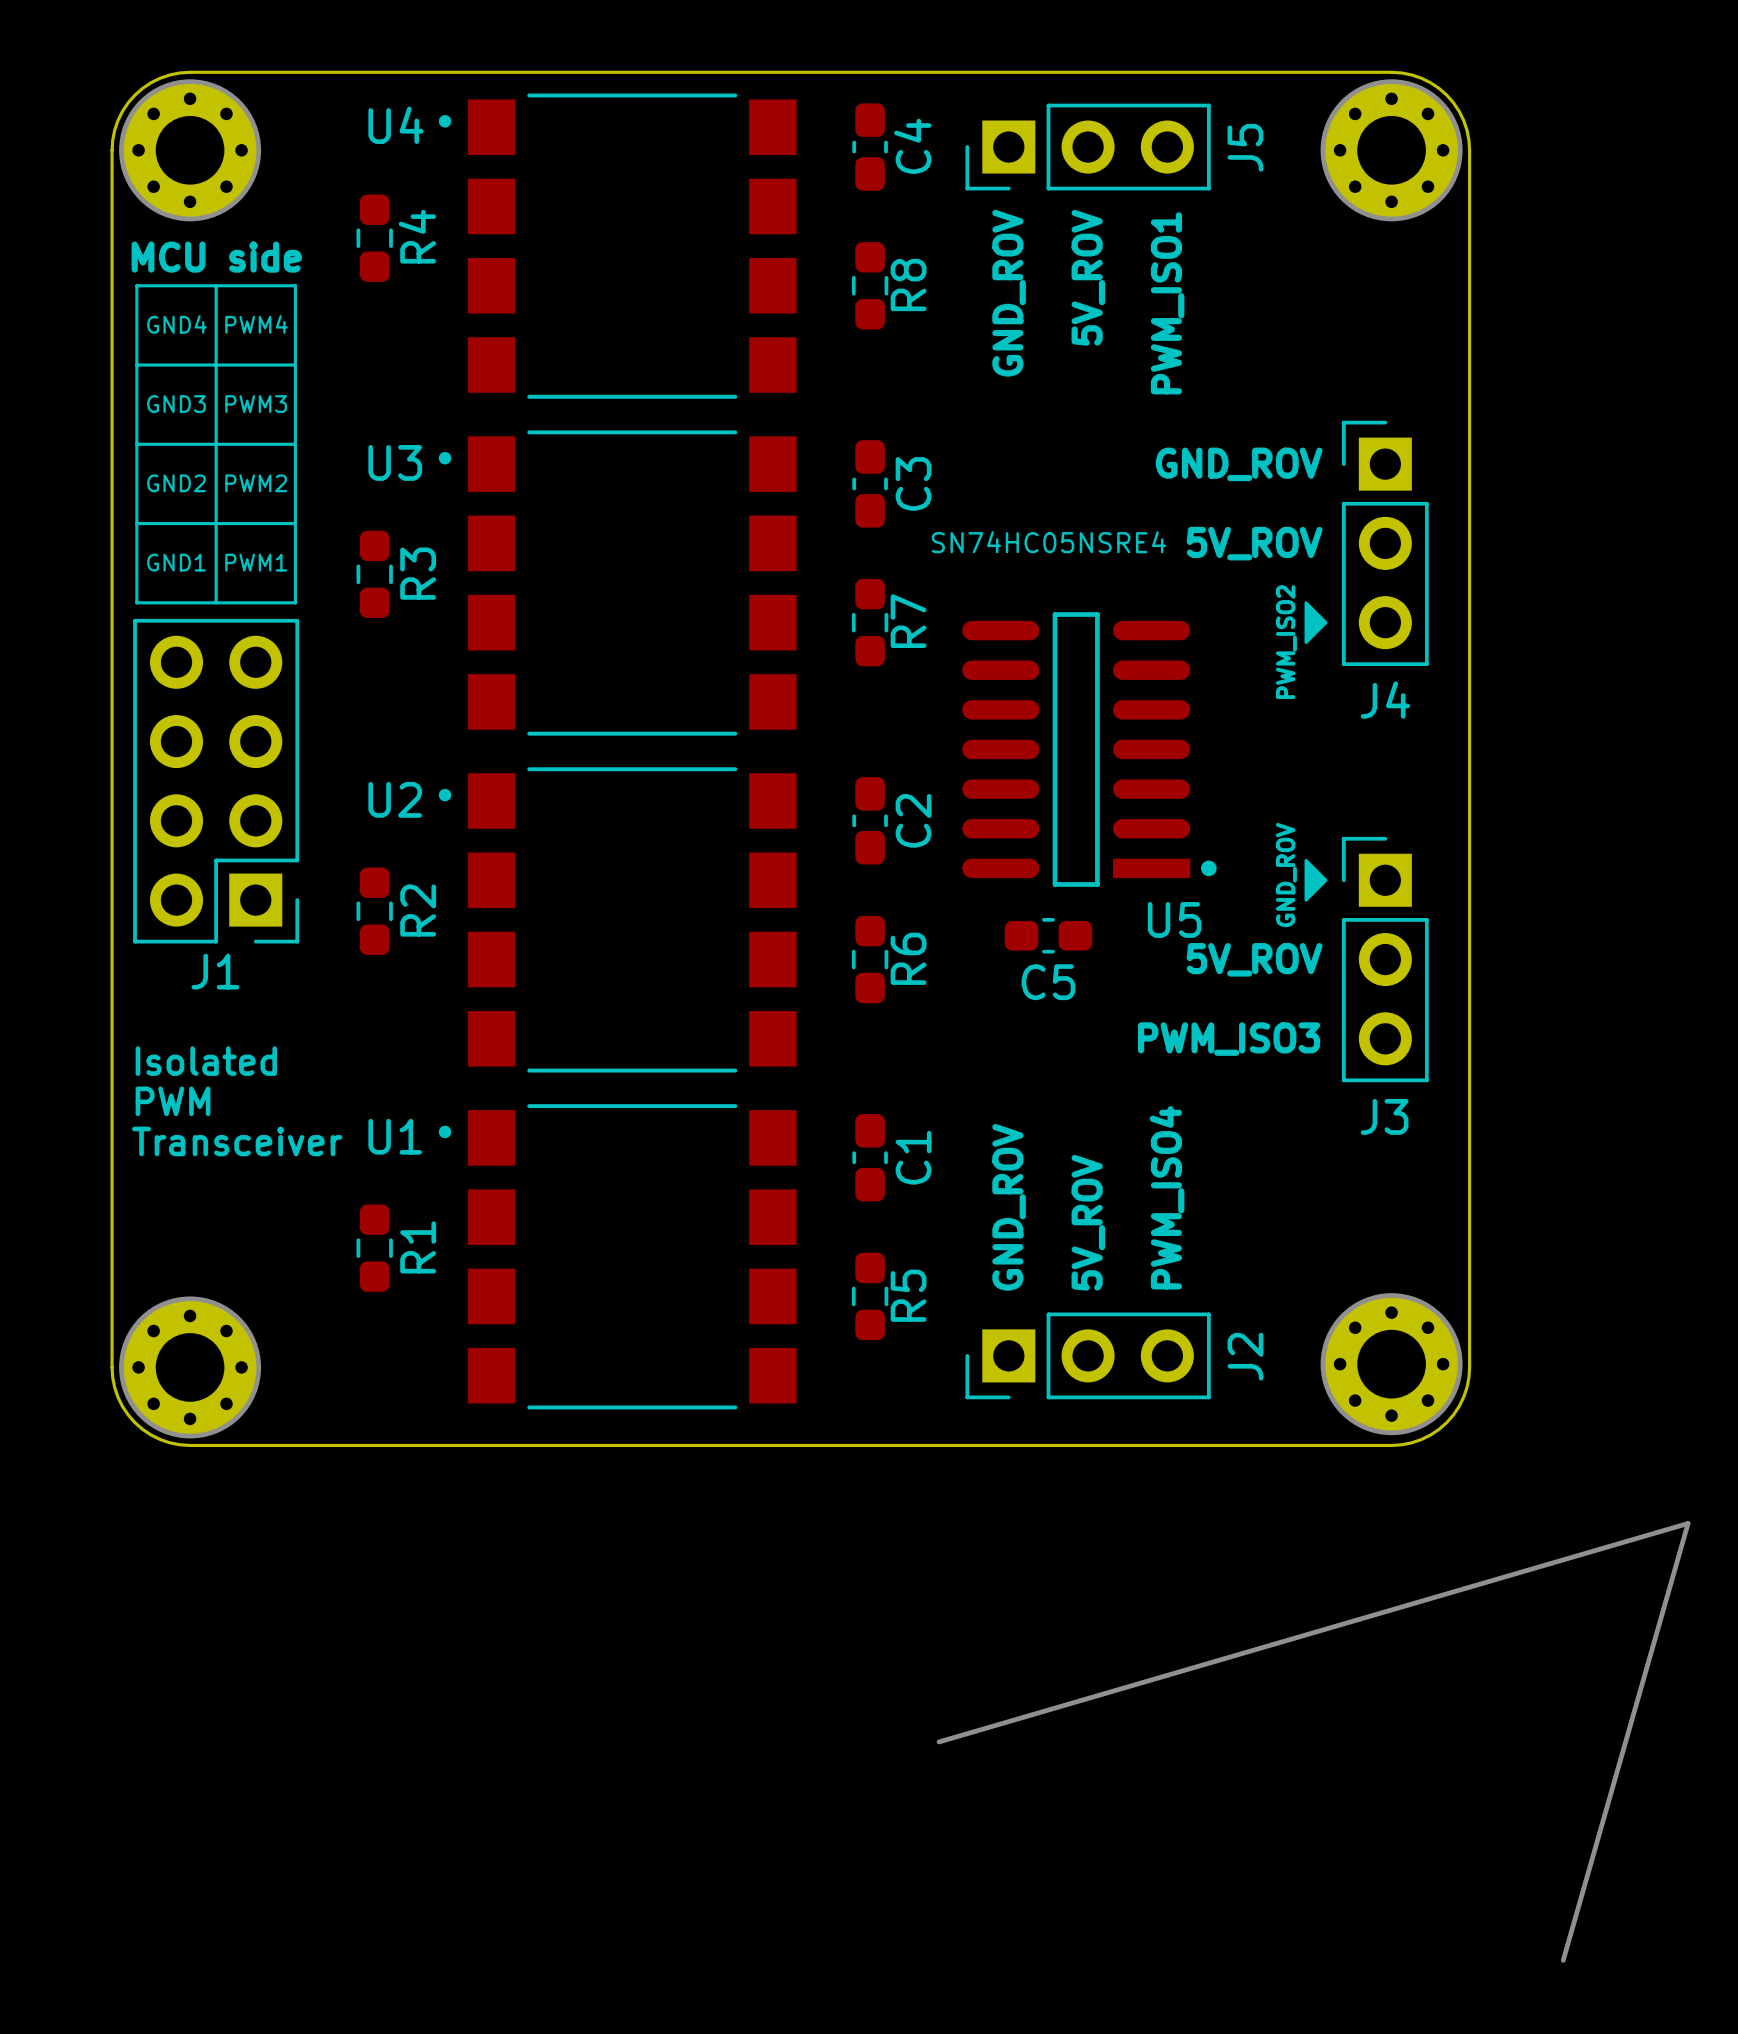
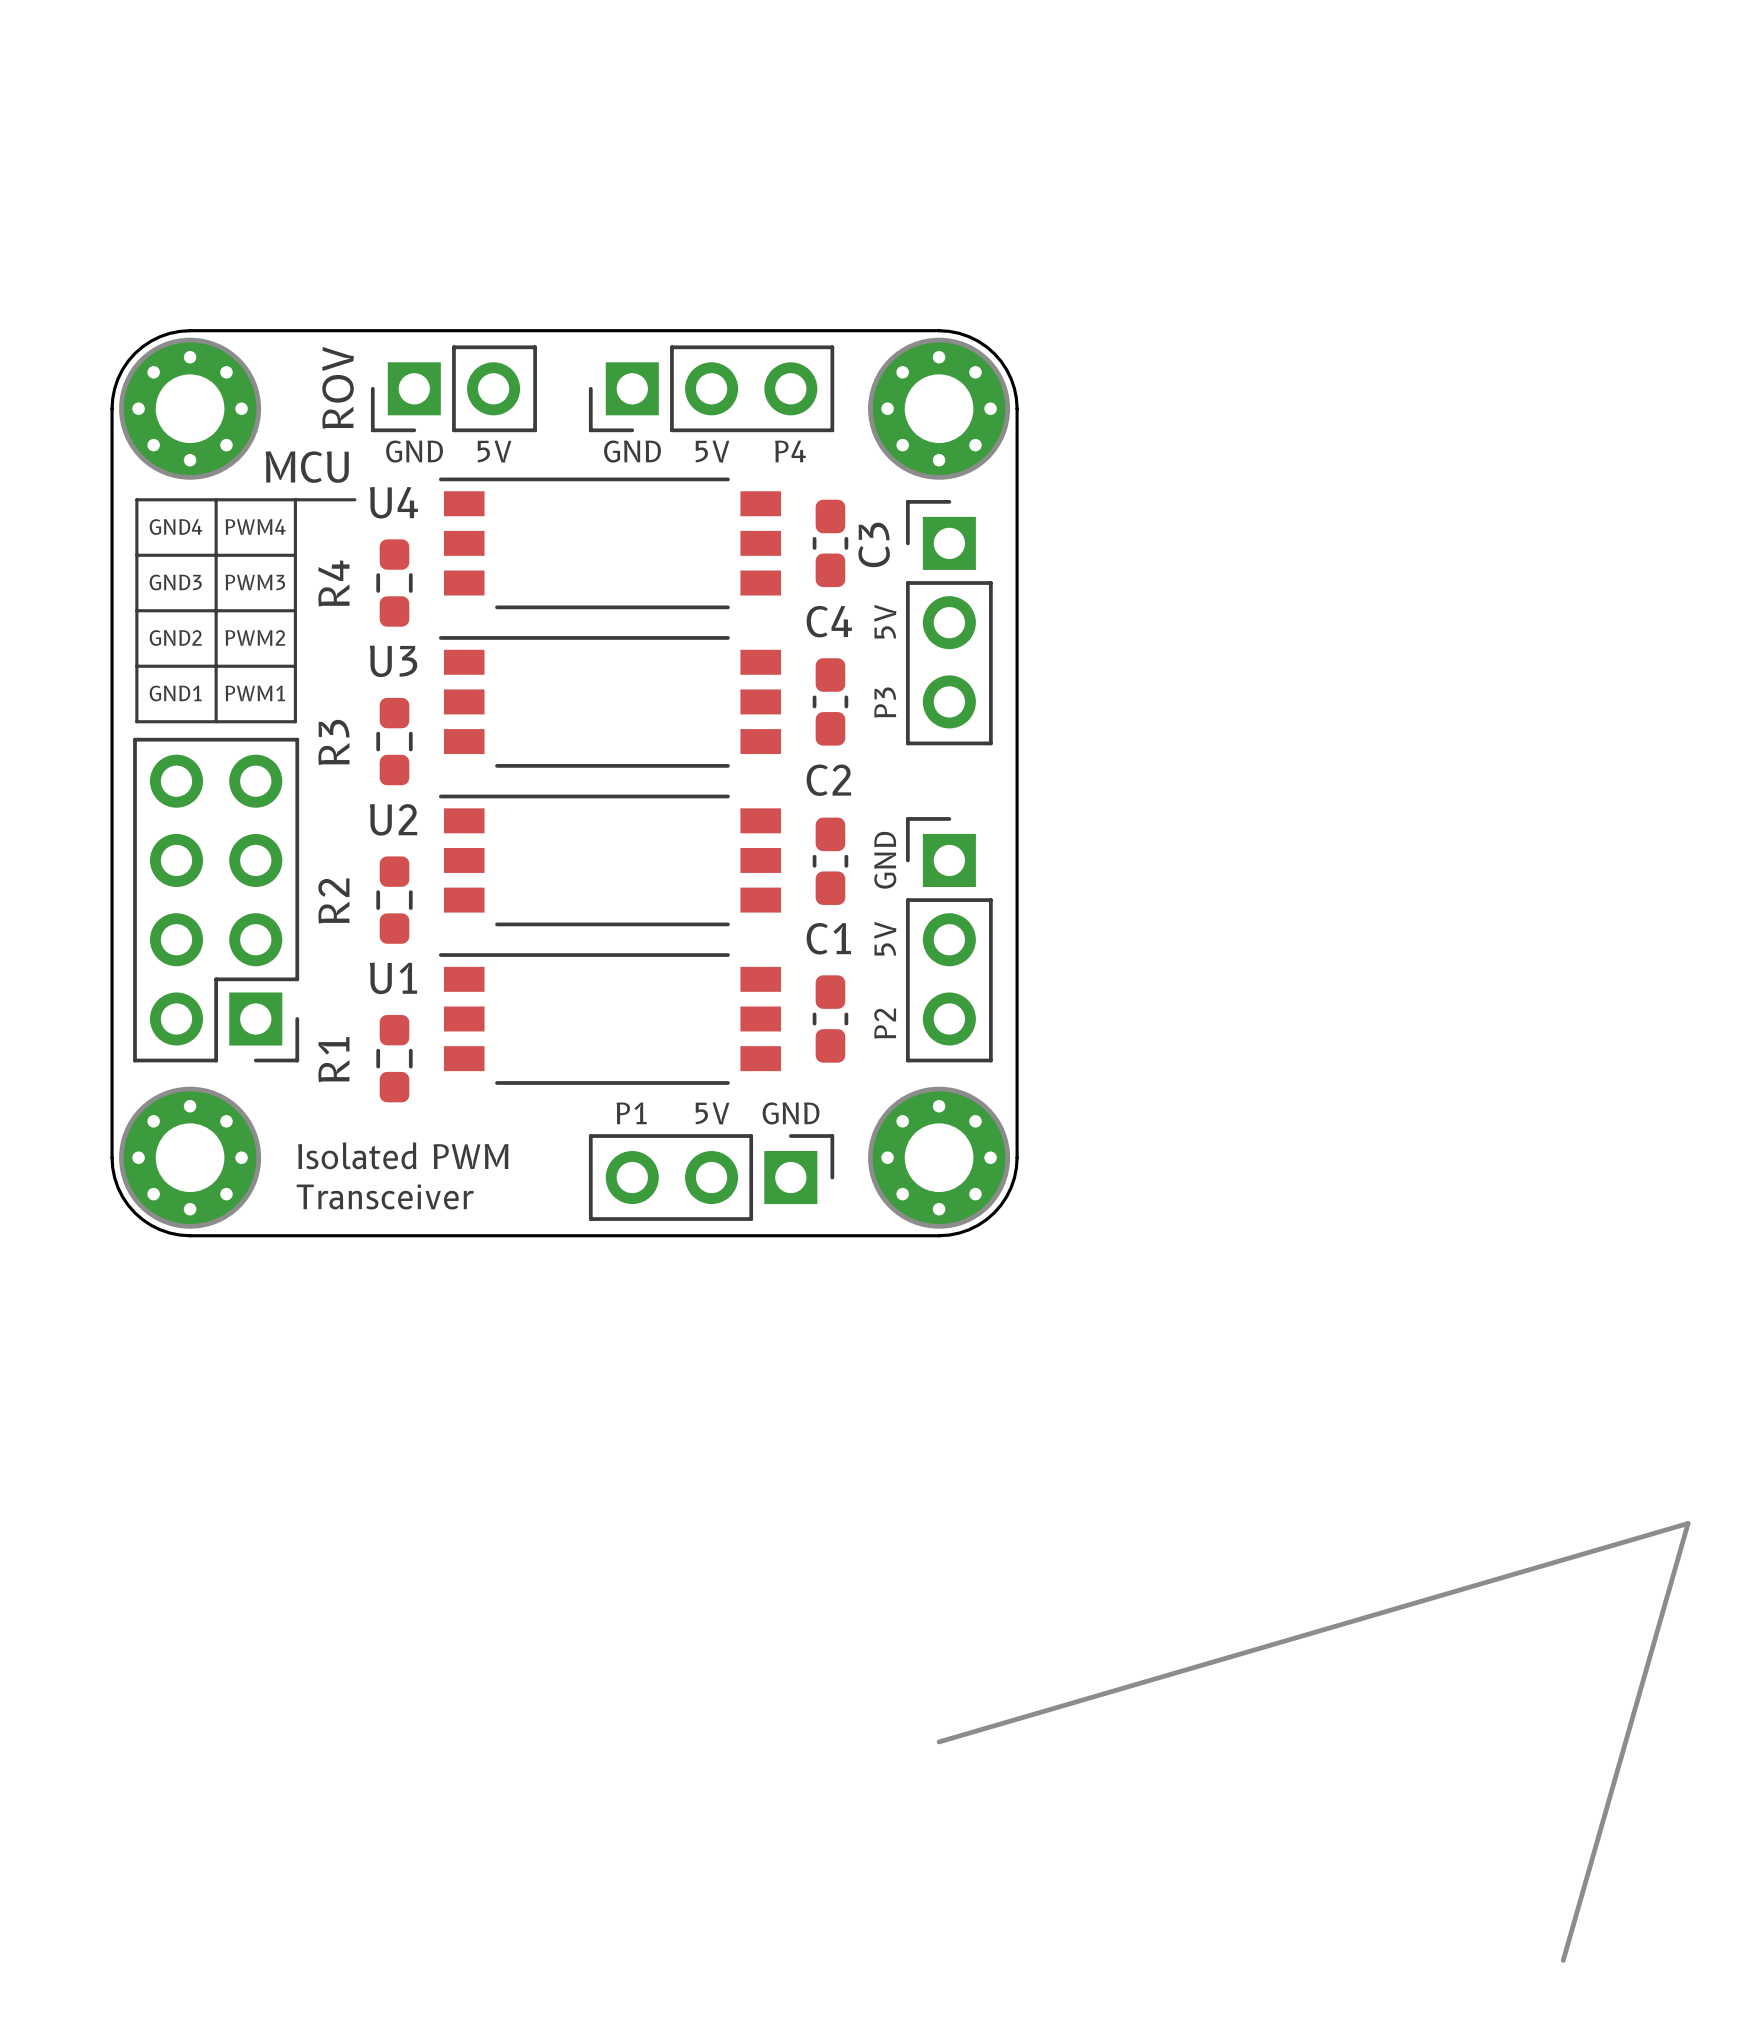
U4 footprint: [438, 93, 797, 399] -> [438, 477, 782, 610]
U4 name position: U4 (395, 125) -> U4 (393, 502)
C4 name rotation: 0° (912, 146) -> 90° clockwise (829, 621)
C4 name position: C4 (912, 146) -> C4 (829, 621)
C4 position: (870, 147) -> (830, 701)
J5: (1088, 147) -> none
part position: (190, 150) -> (190, 408)
part: (1391, 150) -> none
R4 name position: R4 (417, 236) -> R4 (333, 583)
R4 position: (374, 238) -> (394, 583)
text: MCU side (216, 257) -> none
text: 5V_ROV (1088, 277) -> none
line: (216, 285) (216, 499) -> none
R8: (870, 285) -> none
text: GND_ROV (1009, 293) -> none
text: PWM_ISO1 (1167, 303) -> none
text position: GND4 (176, 324) -> GND4 (175, 527)
text position: PWM4 (256, 324) -> PWM4 (255, 526)
line: (136, 365) (295, 365) -> (136, 666) (295, 666)
text: none -> ROV (338, 387)
part: none -> (453, 388)
part: none -> (711, 388)
text position: GND3 (176, 404) -> GND3 (175, 582)
text position: PWM3 (256, 404) -> PWM3 (255, 582)
board edge: (112, 408) (112, 140) (117, 120) (128, 102) (142, 88) (169, 74) (190, 72) (1391, 72) (1411, 74) (1439, 88) (1453, 102) (1466, 130) (1469, 150) (1469, 1367) (1466, 1387) (1459, 1406) (1439, 1429) (1411, 1442) (1391, 1445) (190, 1445) (169, 1442) (151, 1435) (134, 1422) (122, 1406) (114, 1387) (112, 1367) (112, 1157) -> (112, 408) (117, 378) (134, 353) (160, 336) (190, 330) (949, 331) (978, 341) (1000, 361) (1014, 388) (1017, 408) (1017, 1157) (1014, 1177) (1006, 1196) (986, 1219) (959, 1233) (939, 1235) (179, 1235) (151, 1225) (128, 1205) (114, 1177) (112, 1157)
part: none -> (939, 408)
U3 footprint: [438, 430, 797, 736] -> [438, 636, 782, 768]
line: (136, 444) (295, 444) -> (136, 610) (295, 610)
text: none -> P4 (790, 451)
text: none -> GND (414, 451)
text: none -> 5V (494, 451)
text: none -> GND (632, 451)
text: none -> 5V (712, 451)
U3 name position: U3 (395, 462) -> U3 (393, 661)
text: GND_ROV (1239, 464) -> none
text: none -> MCU (307, 467)
text position: GND2 (176, 483) -> GND2 (175, 638)
text position: PWM2 (256, 483) -> PWM2 (255, 637)
C3 position: (870, 483) -> (830, 543)
line: (136, 499) (136, 285) (295, 285) (295, 499) -> (136, 499) (354, 499)
line: (136, 523) (295, 523) -> (136, 555) (295, 555)
text: 5V_ROV (1254, 543) -> none
J4: (1385, 543) -> none
text position: GND1 (176, 562) -> GND1 (175, 693)
text position: PWM1 (256, 562) -> PWM1 (255, 693)
R3 name position: R3 (418, 573) -> R3 (333, 742)
R3 position: (374, 574) -> (394, 741)
drawing: [1304, 601, 1328, 645] -> none
line: (136, 602) (295, 602) -> (136, 602) (136, 721) (295, 721) (295, 602)
line: none -> (216, 602) (216, 721)
text: none -> 5V (885, 621)
R7: (870, 622) -> none
part: none -> (949, 622)
text: PWM_ISO2 (1286, 642) -> none
text: none -> P3 (885, 702)
U5: SN74HC05NSRE4 (1089, 749) -> none
U2 footprint: [438, 767, 797, 1073] -> [438, 794, 782, 927]
J1: (216, 781) -> none
U2 name position: U2 (395, 799) -> U2 (393, 819)
C2 position: (870, 820) -> (830, 861)
C2 name rotation: 0° (913, 820) -> 90° clockwise (828, 780)
C2 name position: C2 (913, 820) -> C2 (828, 780)
drawing: [1304, 858, 1328, 902] -> none
text: none -> GND (885, 860)
text: GND_ROV (1286, 875) -> none
part: none -> (216, 900)
R2 name position: R2 (418, 910) -> R2 (333, 901)
R2 position: (374, 911) -> (394, 900)
C5: (1048, 935) -> none
text: none -> 5V (885, 938)
part: none -> (949, 939)
R6: (870, 959) -> none
text: 5V_ROV (1254, 959) -> none
J3: (1385, 959) -> none
text: none -> P2 (885, 1023)
text: PWM_ISO3 (1229, 1039) -> none
text: Isolated (206, 1061) -> none
text: PWM (173, 1101) -> none
U1 footprint: [438, 1104, 797, 1410] -> [438, 953, 782, 1085]
text: none -> P1 (631, 1113)
text: none -> 5V (712, 1113)
text: none -> GND (791, 1113)
U1 name position: U1 (395, 1136) -> U1 (393, 978)
text position: Transceiver (237, 1141) -> Transceiver (385, 1197)
text: none -> Isolated PWM (403, 1155)
C1 position: (870, 1157) -> (830, 1019)
C1 name rotation: 0° (913, 1157) -> 90° clockwise (828, 938)
C1 name position: C1 (913, 1157) -> C1 (828, 938)
part: none -> (939, 1157)
part: none -> (711, 1177)
text: PWM_ISO4 (1167, 1197) -> none
text: GND_ROV (1009, 1207) -> none
text: 5V_ROV (1088, 1222) -> none
R1 name position: R1 (418, 1247) -> R1 (333, 1059)
R1 position: (374, 1248) -> (394, 1058)
R5: (870, 1296) -> none
J2: (1088, 1355) -> none
part: (1391, 1364) -> none
part position: (190, 1367) -> (190, 1157)

